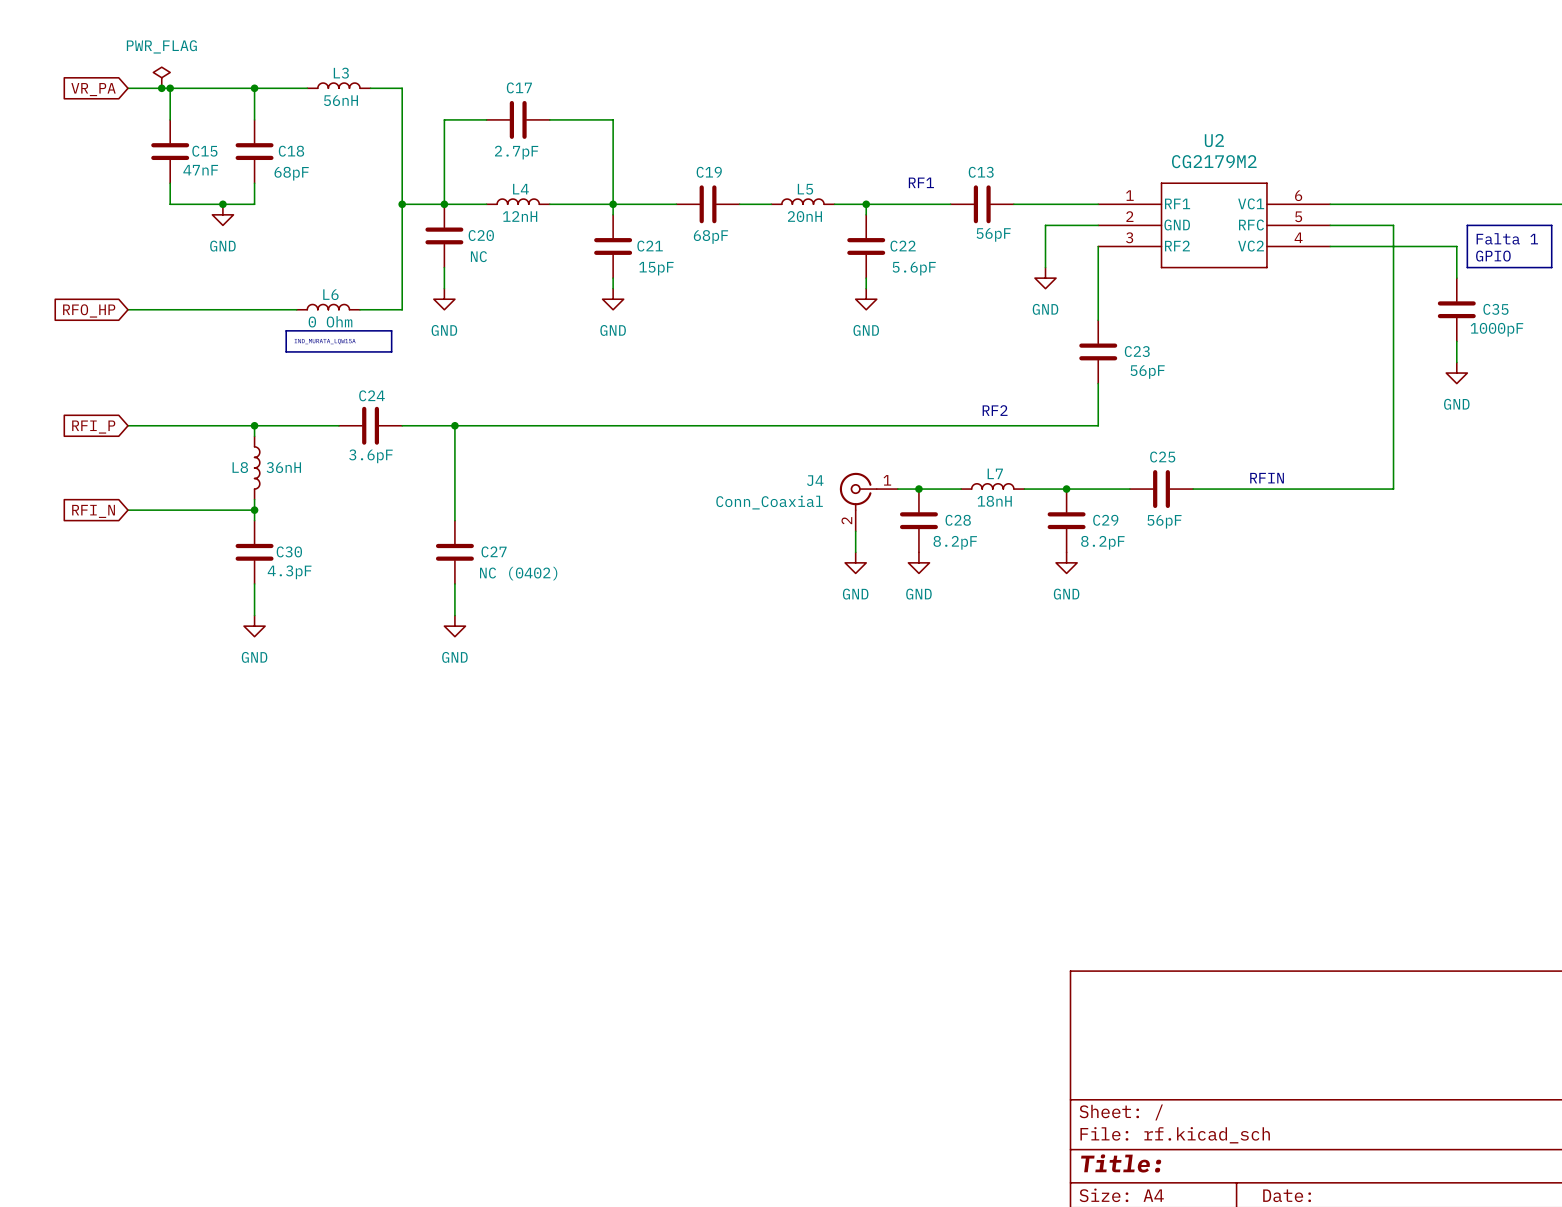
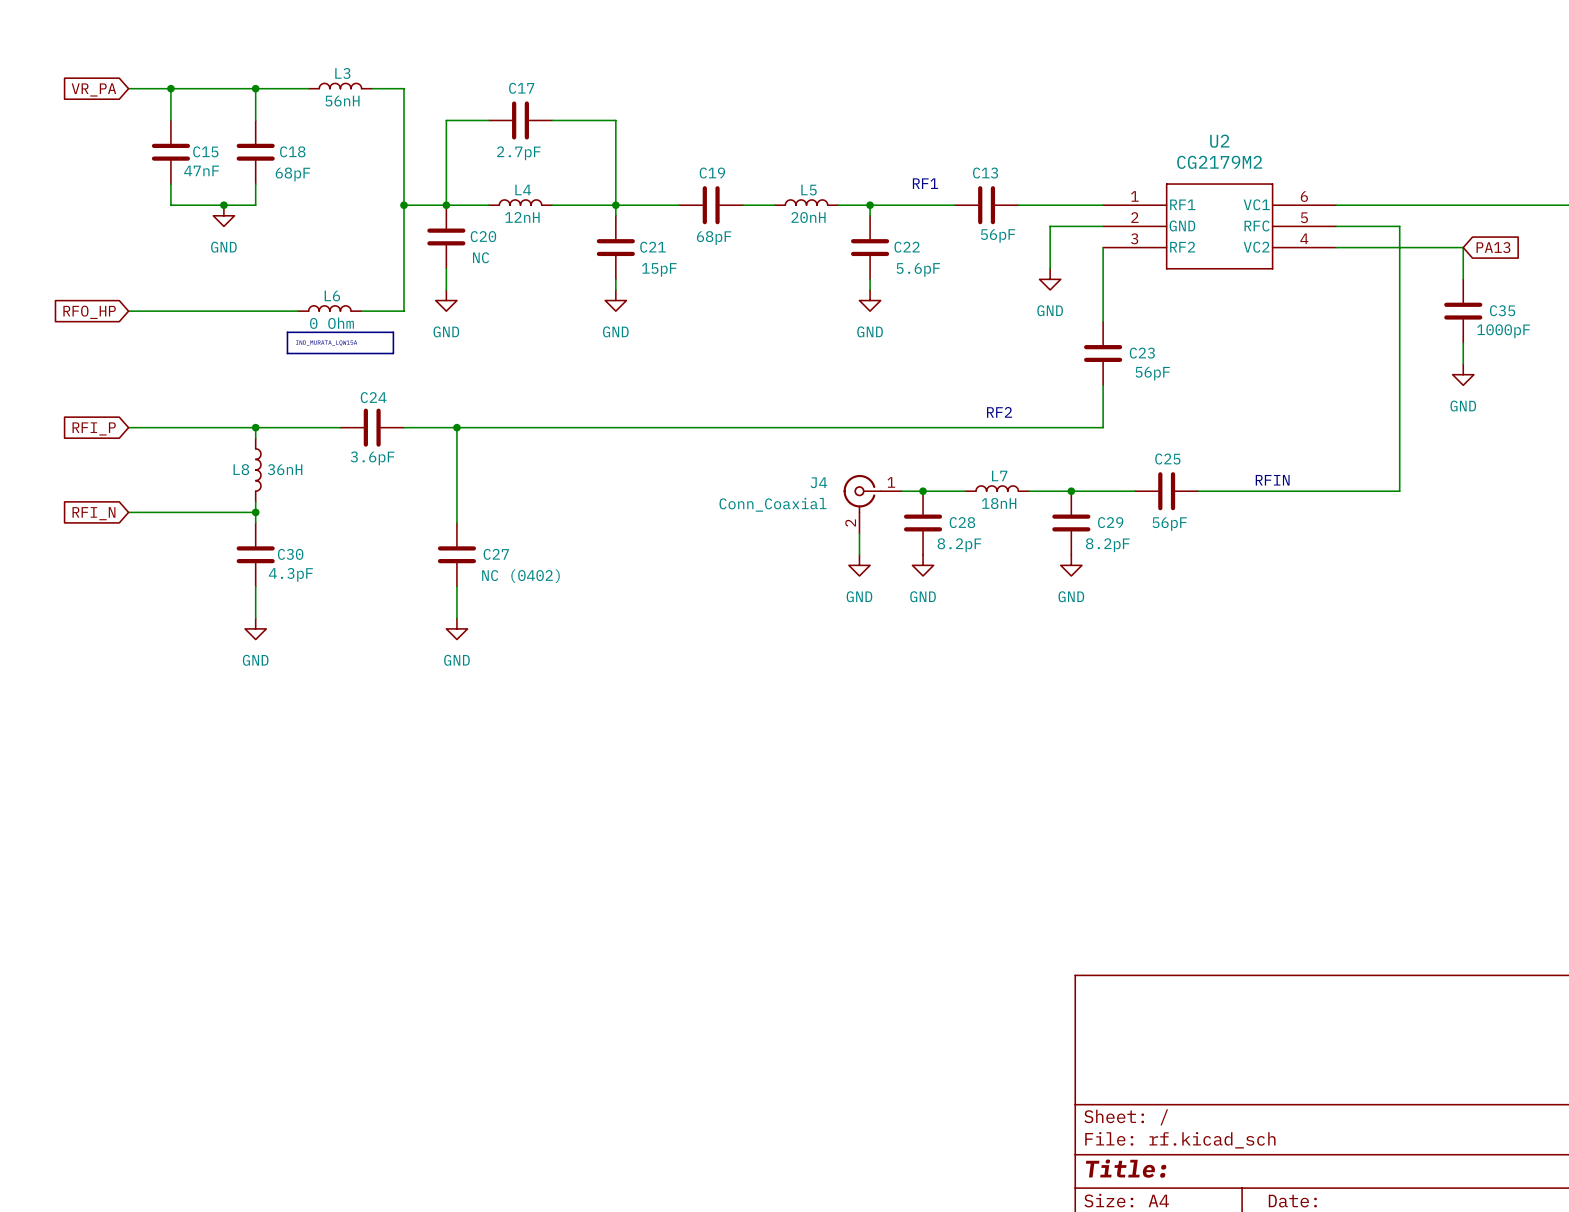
power symbol: PWR_FLAG (161, 77) -> none
junction: (161, 88) -> none
line: (1467, 225) (1551, 225) (1551, 267) (1467, 267) (1467, 225) -> none
text: Falta 1 (1507, 238) -> none
global label: none -> PA13 (1493, 247)
text: GPIO (1493, 256) -> none

